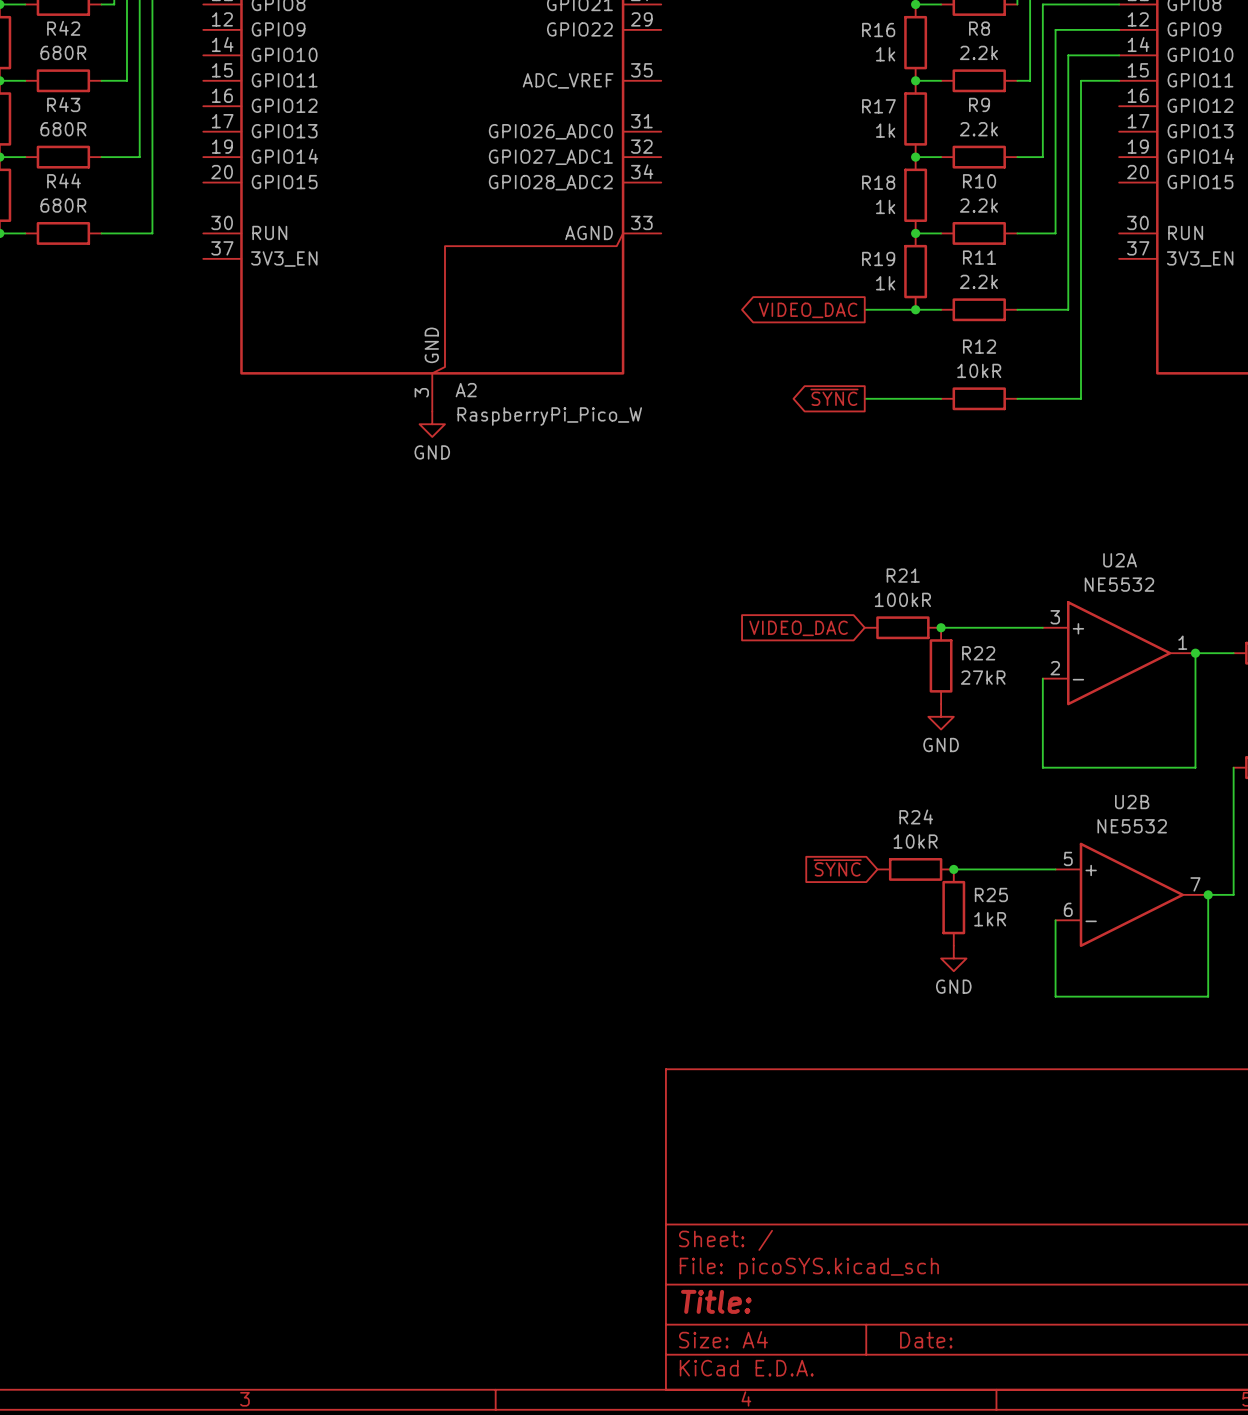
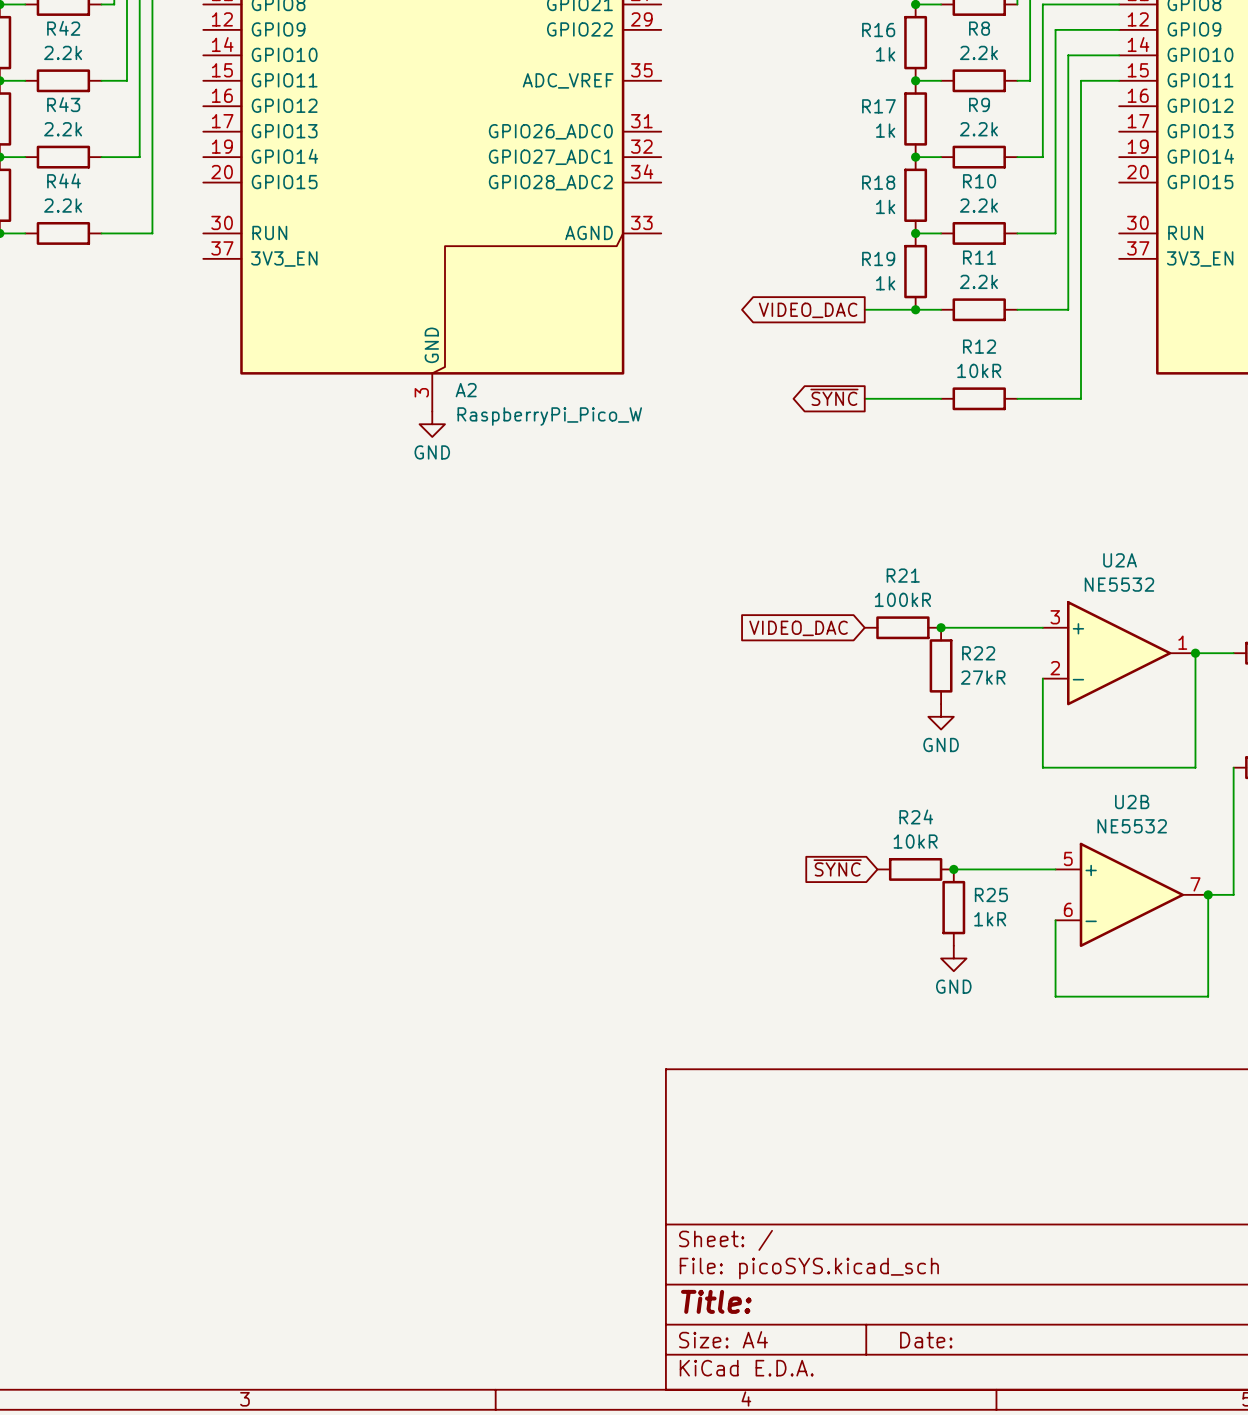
R42 value: 680R (63, 52) -> 2.2k (63, 52)
R43 value: 680R (63, 129) -> 2.2k (63, 129)
R44 value: 680R (63, 205) -> 2.2k (63, 205)

